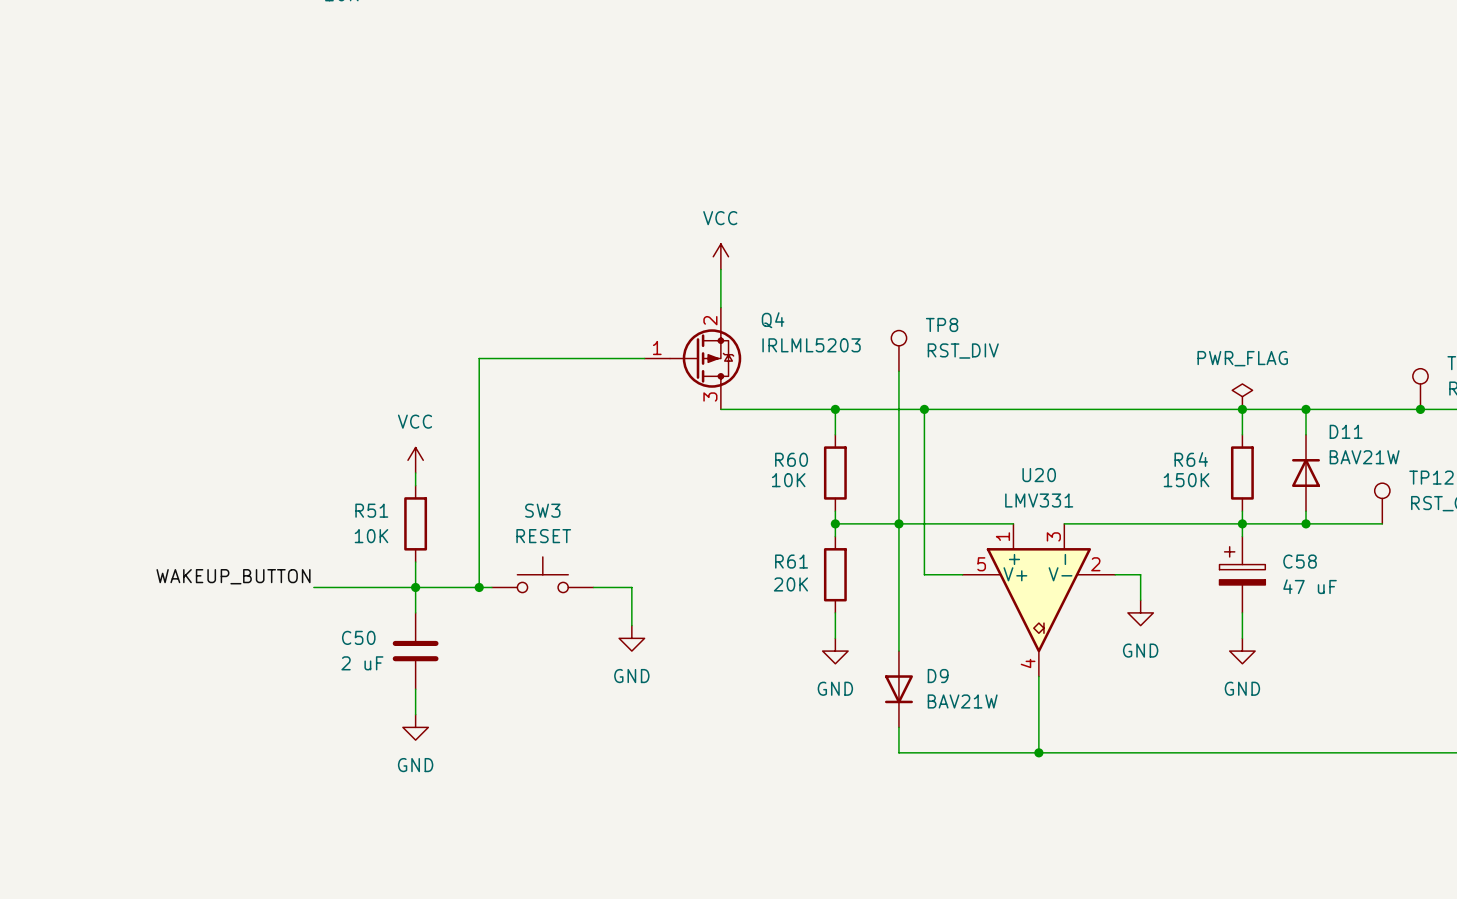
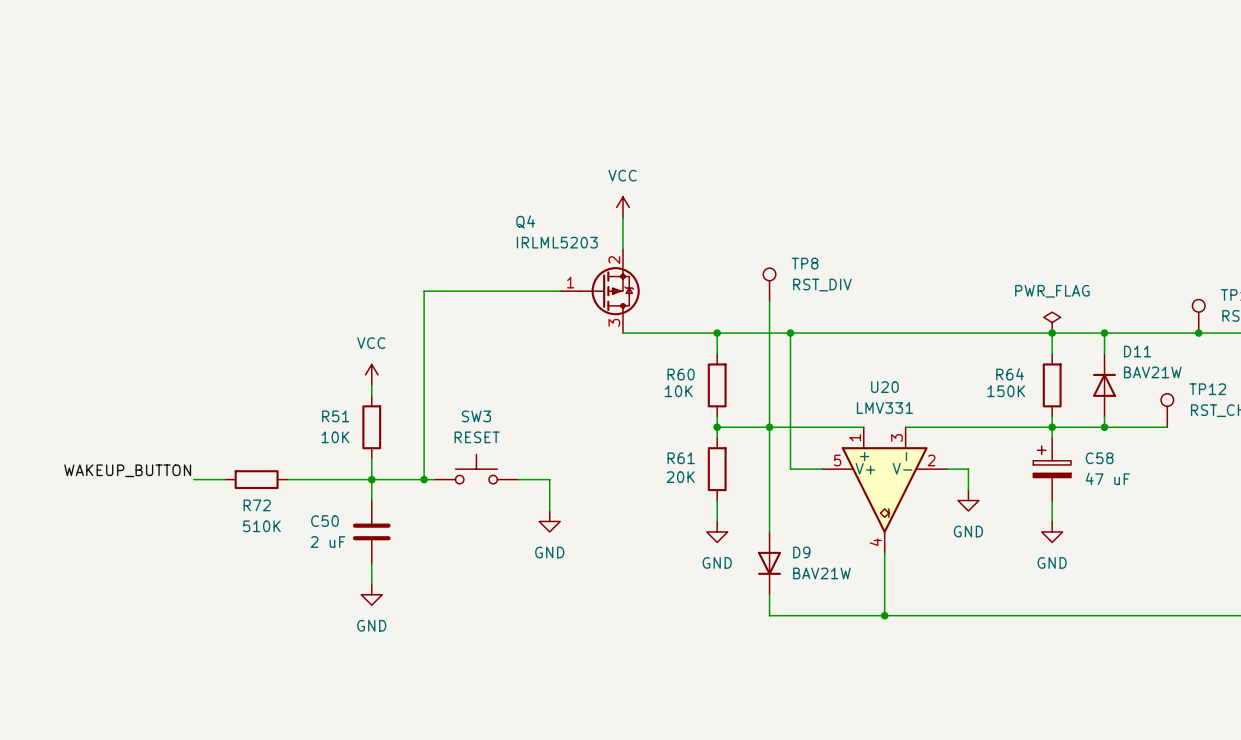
Q4 name position: Q4 (773, 320) -> Q4 (525, 221)
Q4 value position: IRLML5203 (811, 345) -> IRLML5203 (557, 242)
label position: WAKEUP_BUTTON (233, 576) -> WAKEUP_BUTTON (127, 470)
wire: none -> (193, 479) (225, 479)
R72: none -> 510K (256, 479)

